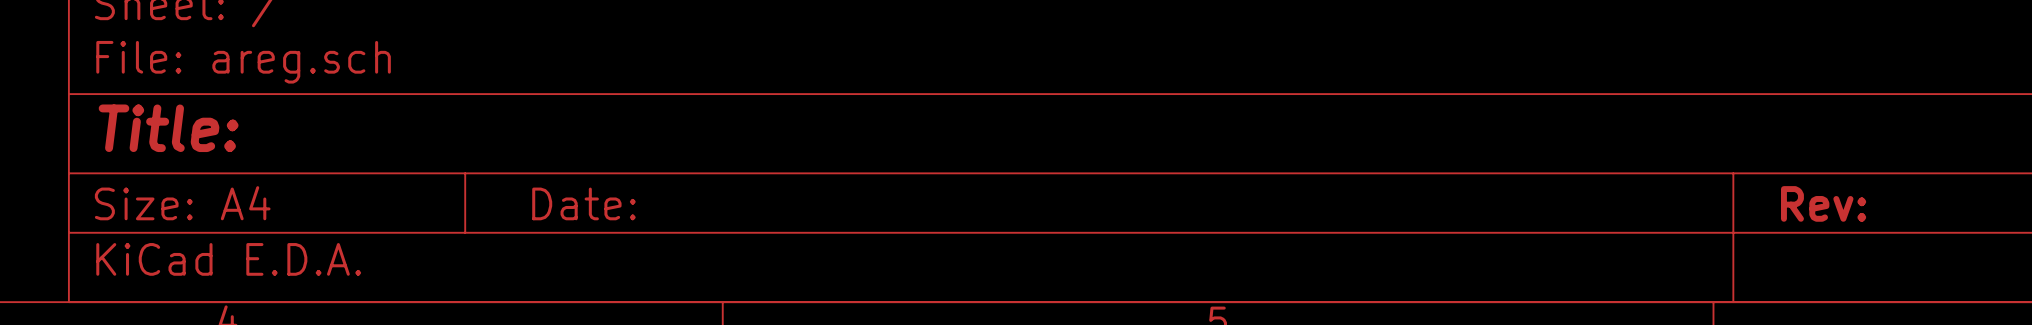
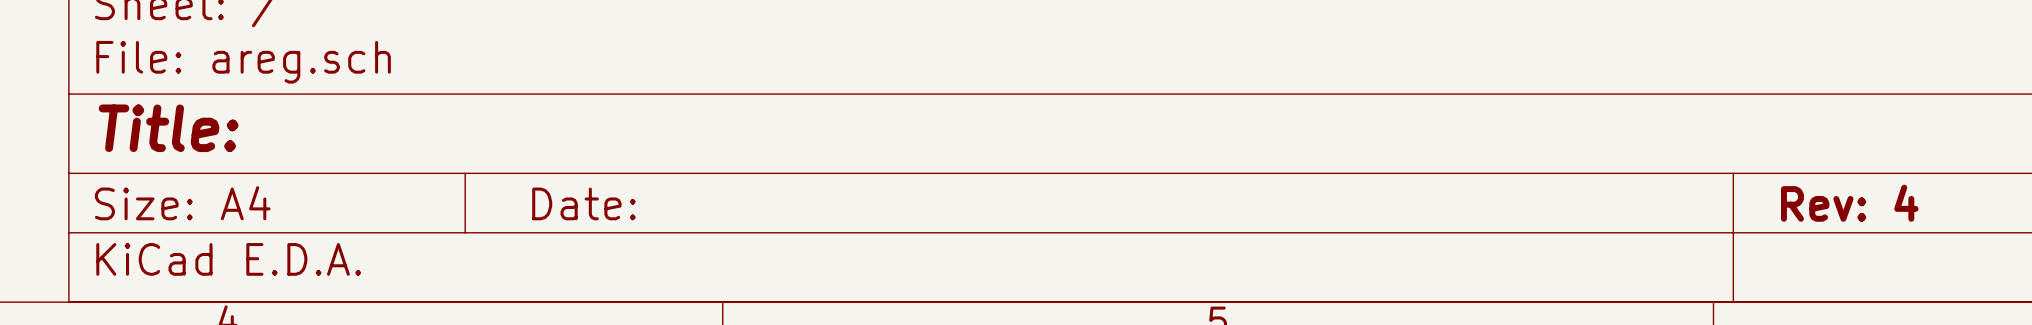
title block: Rev: (1823, 203) -> Rev: 4 (1849, 203)

